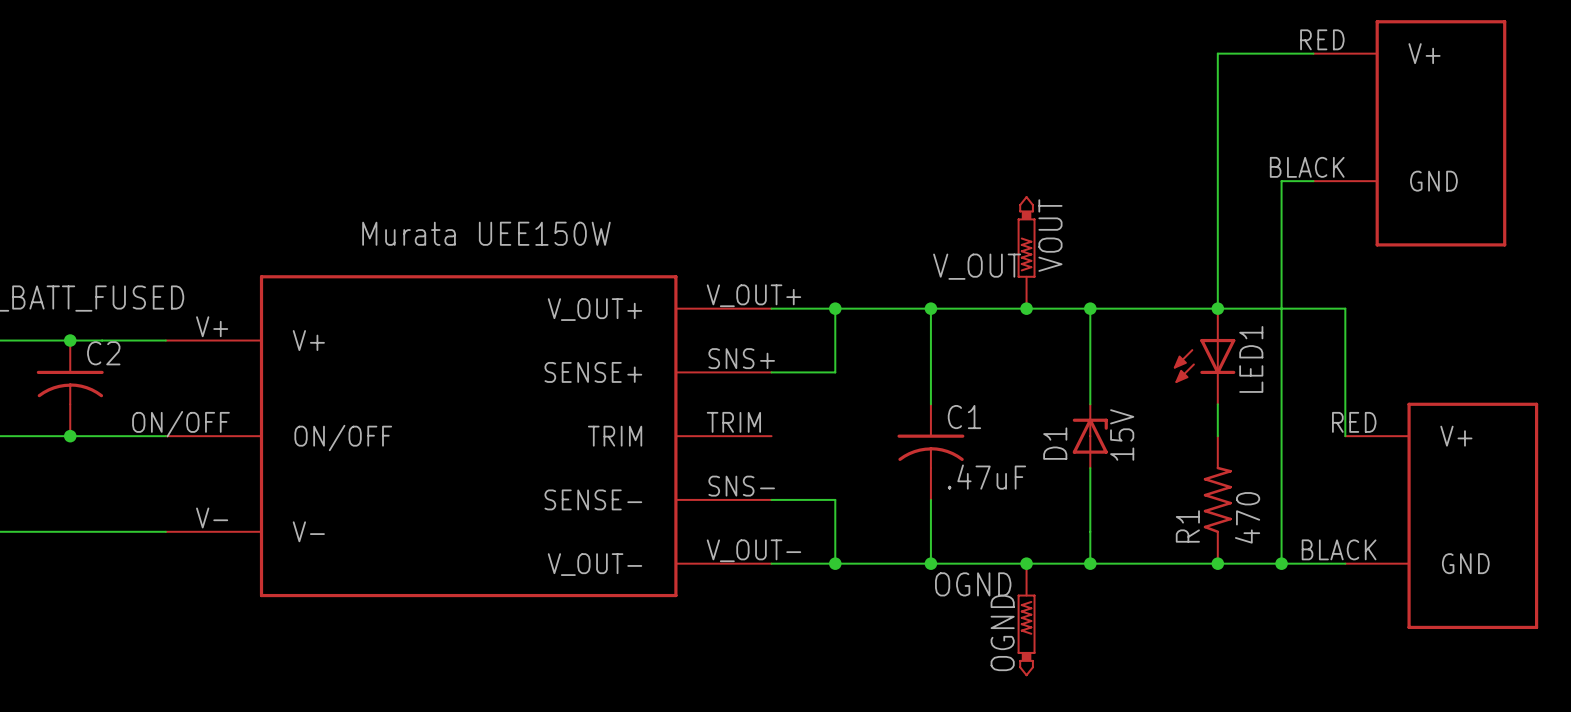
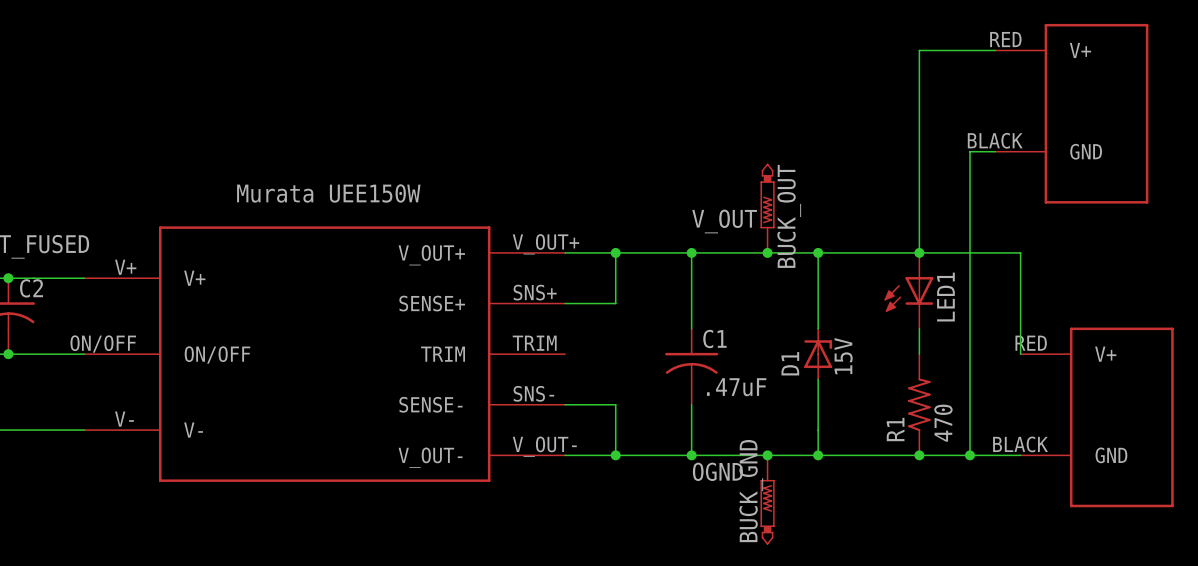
VOUT name: VOUT (1050, 235) -> BUCK_OUT (789, 216)
OGND name: OGND (1002, 632) -> BUCK_GND (751, 491)

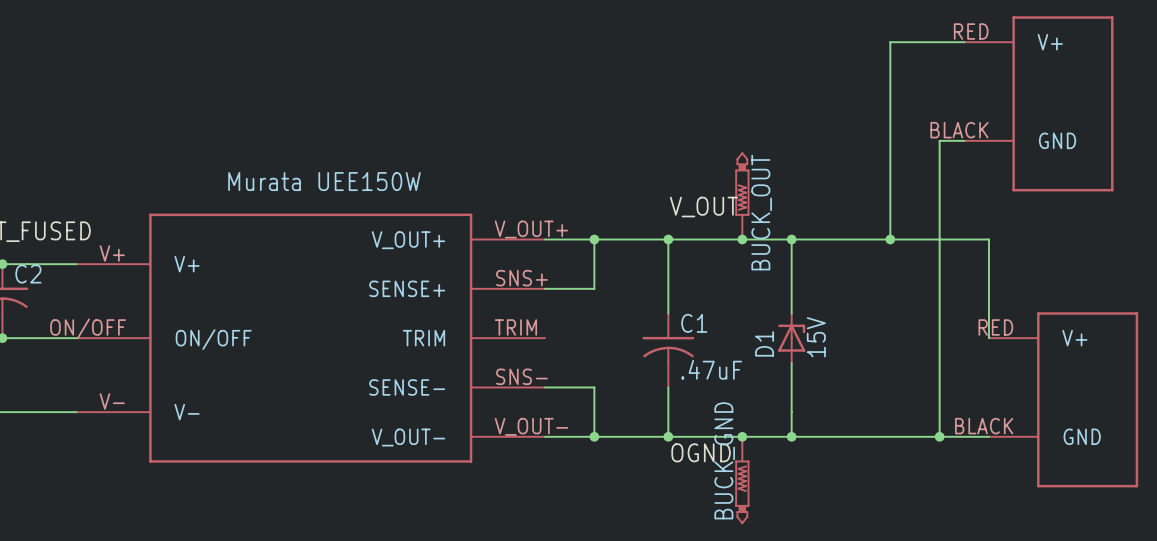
LED1: (908, 290) -> none
wire: (919, 328) (919, 354) -> none
R1: 470 (919, 404) -> none
junction: (919, 455) -> none

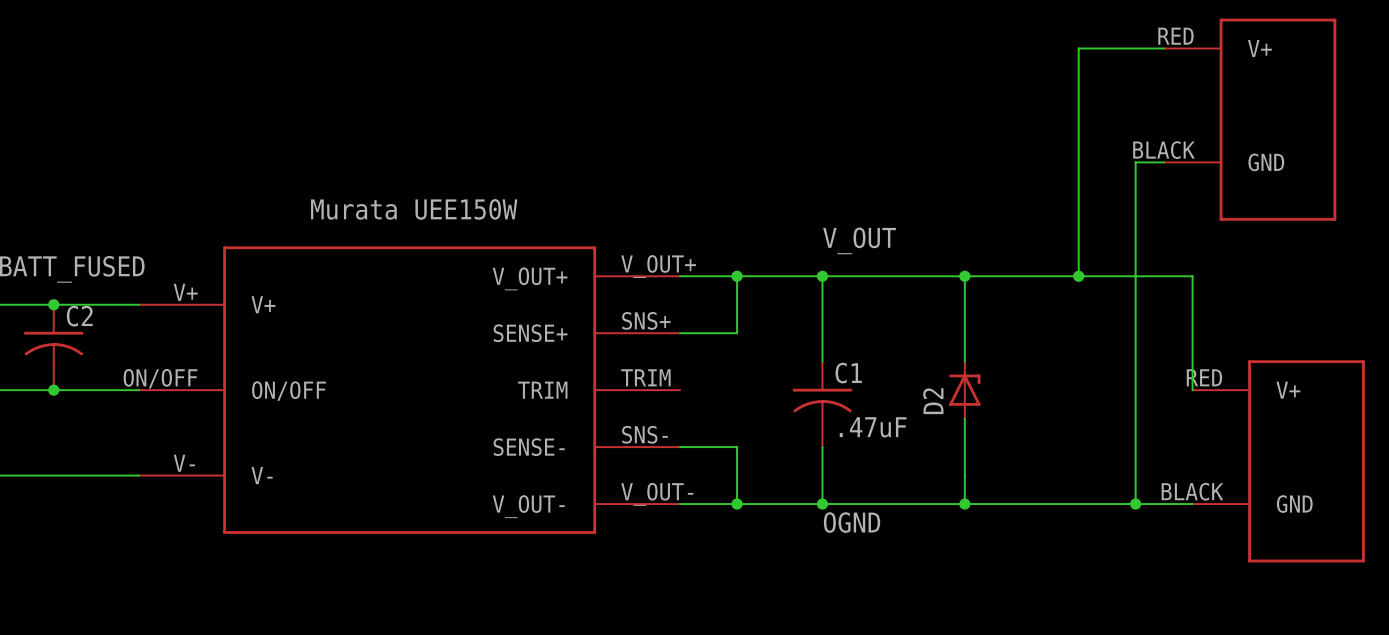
BUCK_OUT: (742, 195) -> none
junction: (742, 239) -> none
D1 value: 15V (816, 337) -> none
D1 name: D1 (764, 343) -> D2 (933, 401)
junction: (742, 436) -> none
BUCK_GND: (742, 480) -> none

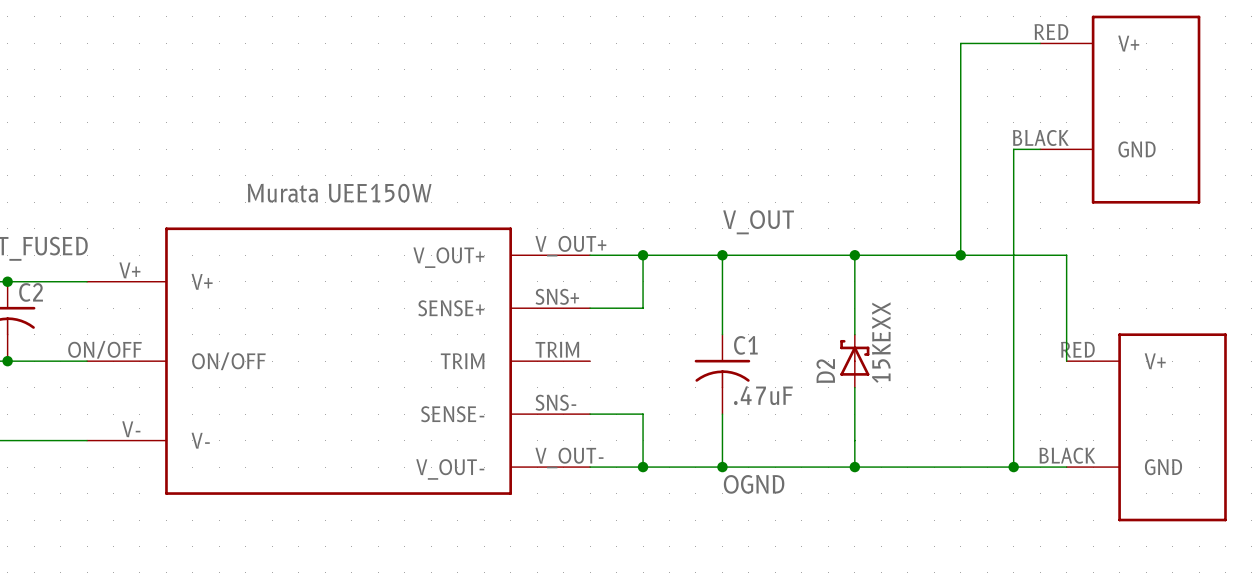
D2 symbol: [949, 361, 981, 419] -> [840, 334, 870, 388]
D2 value: none -> 15KEXX (881, 342)

